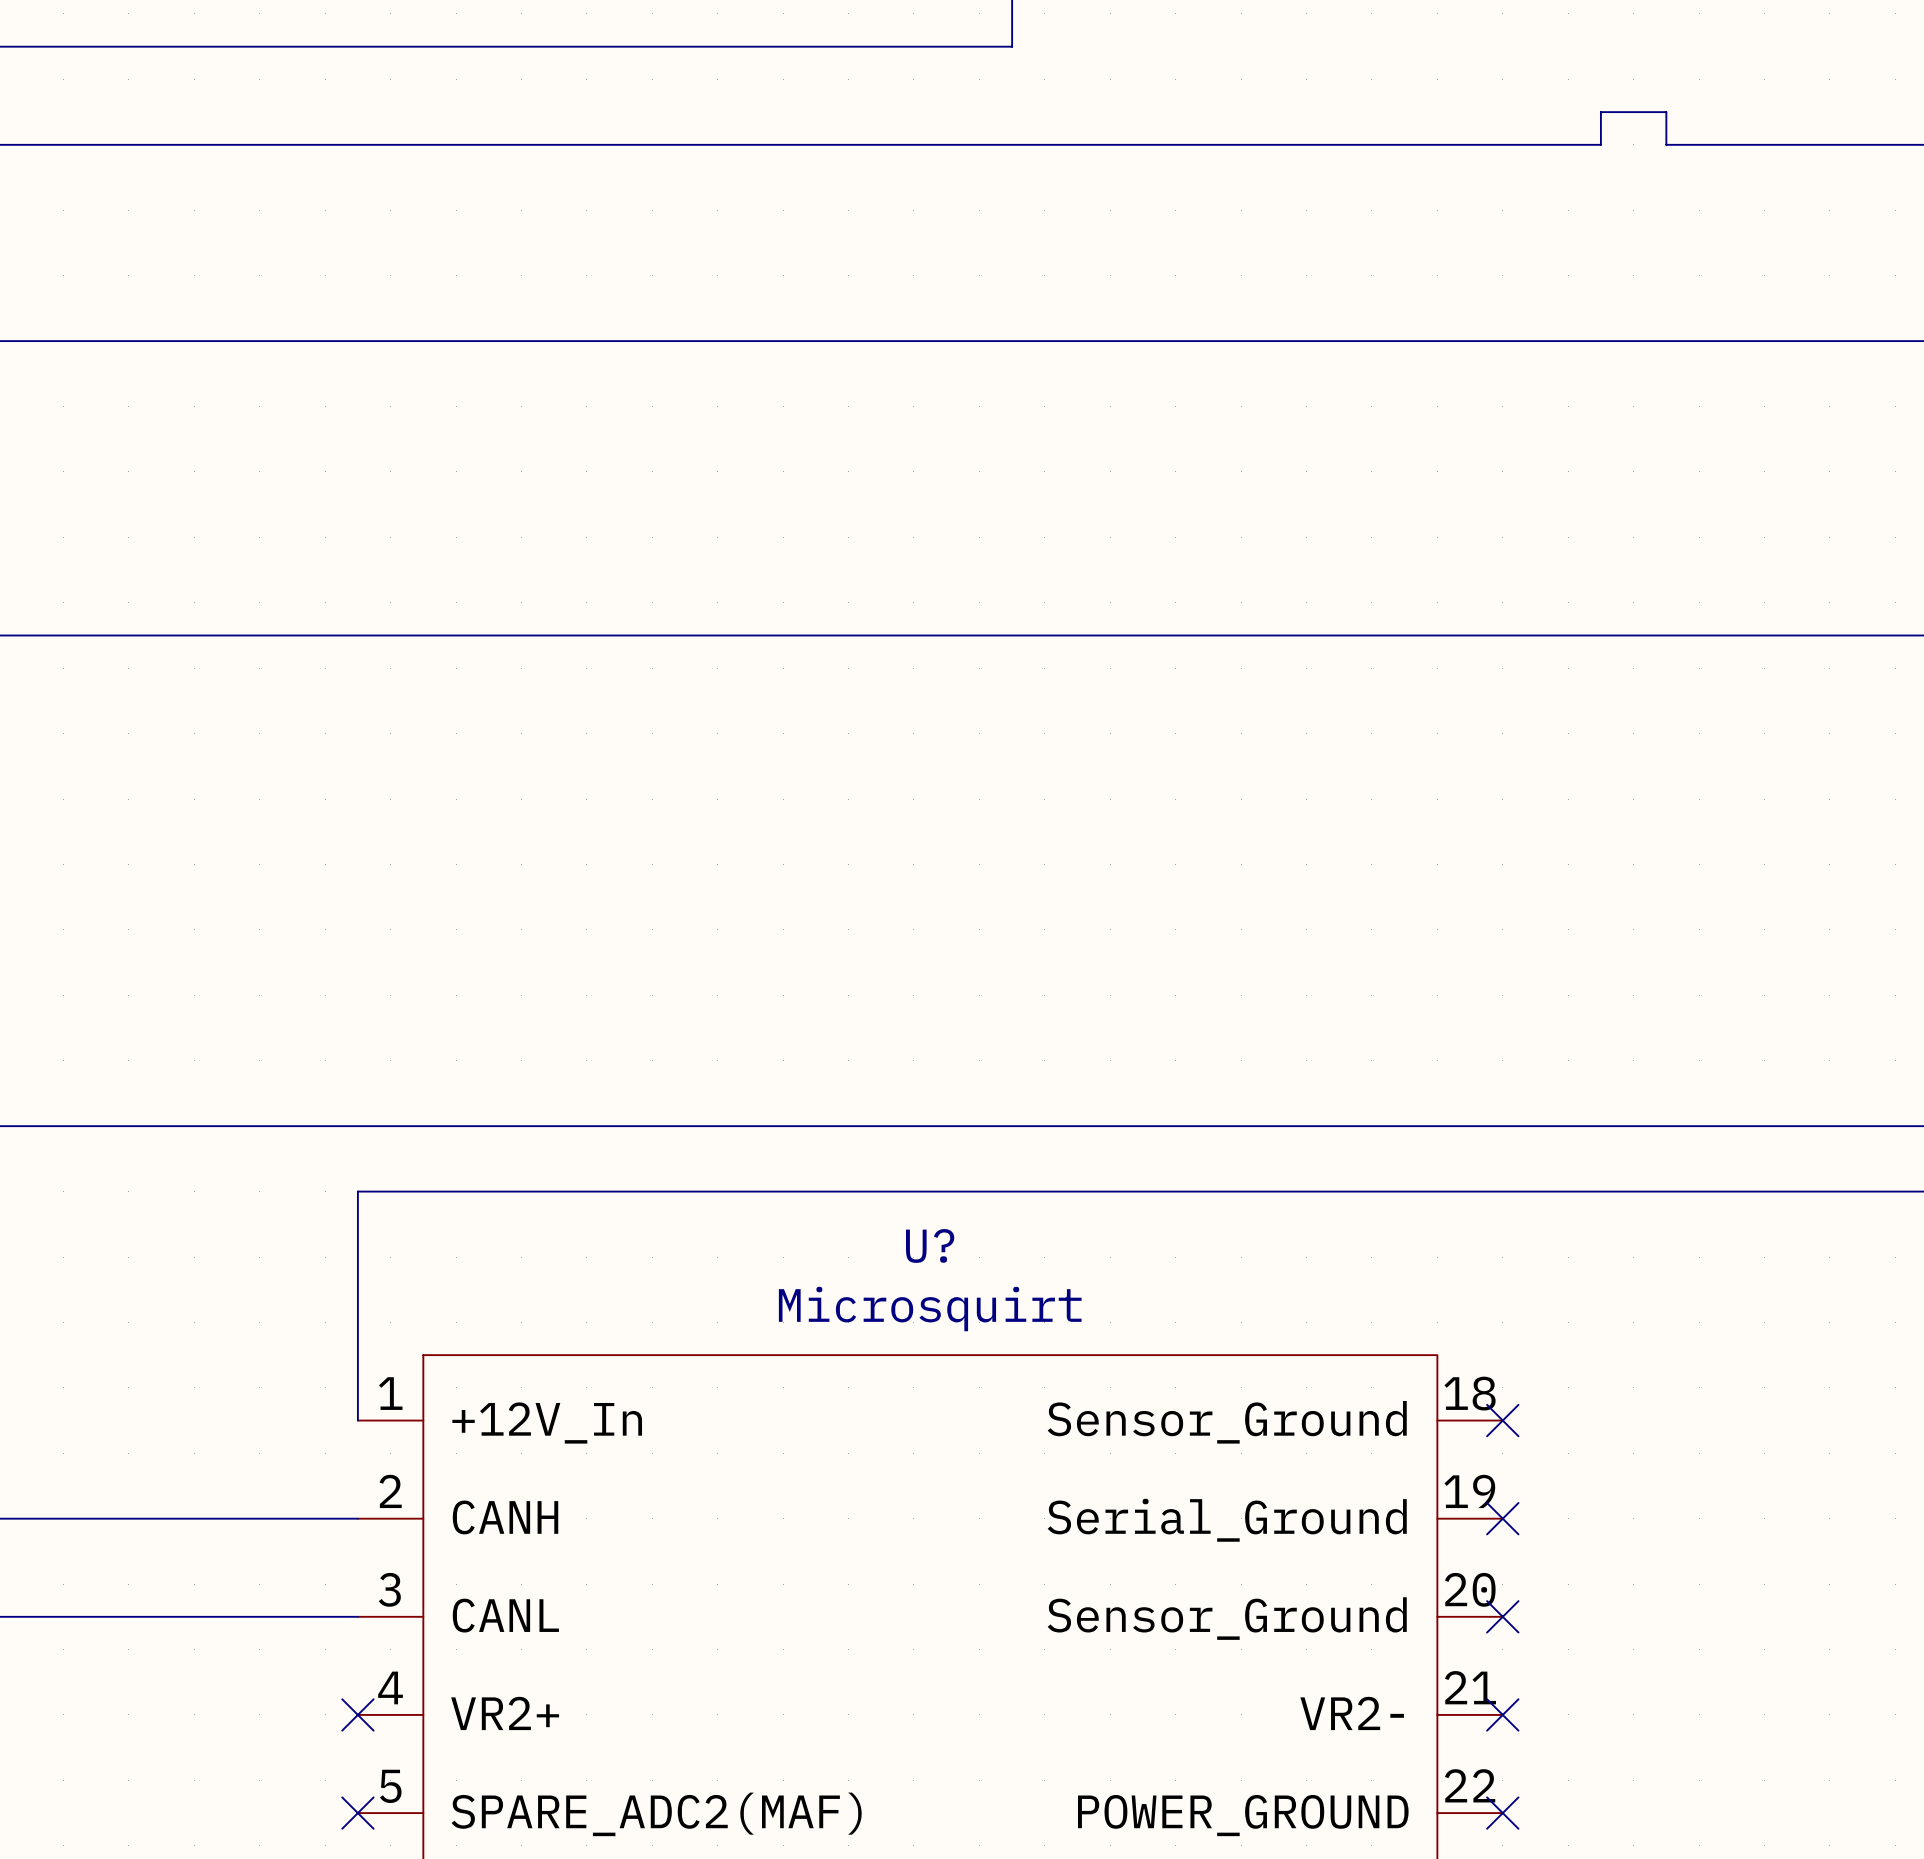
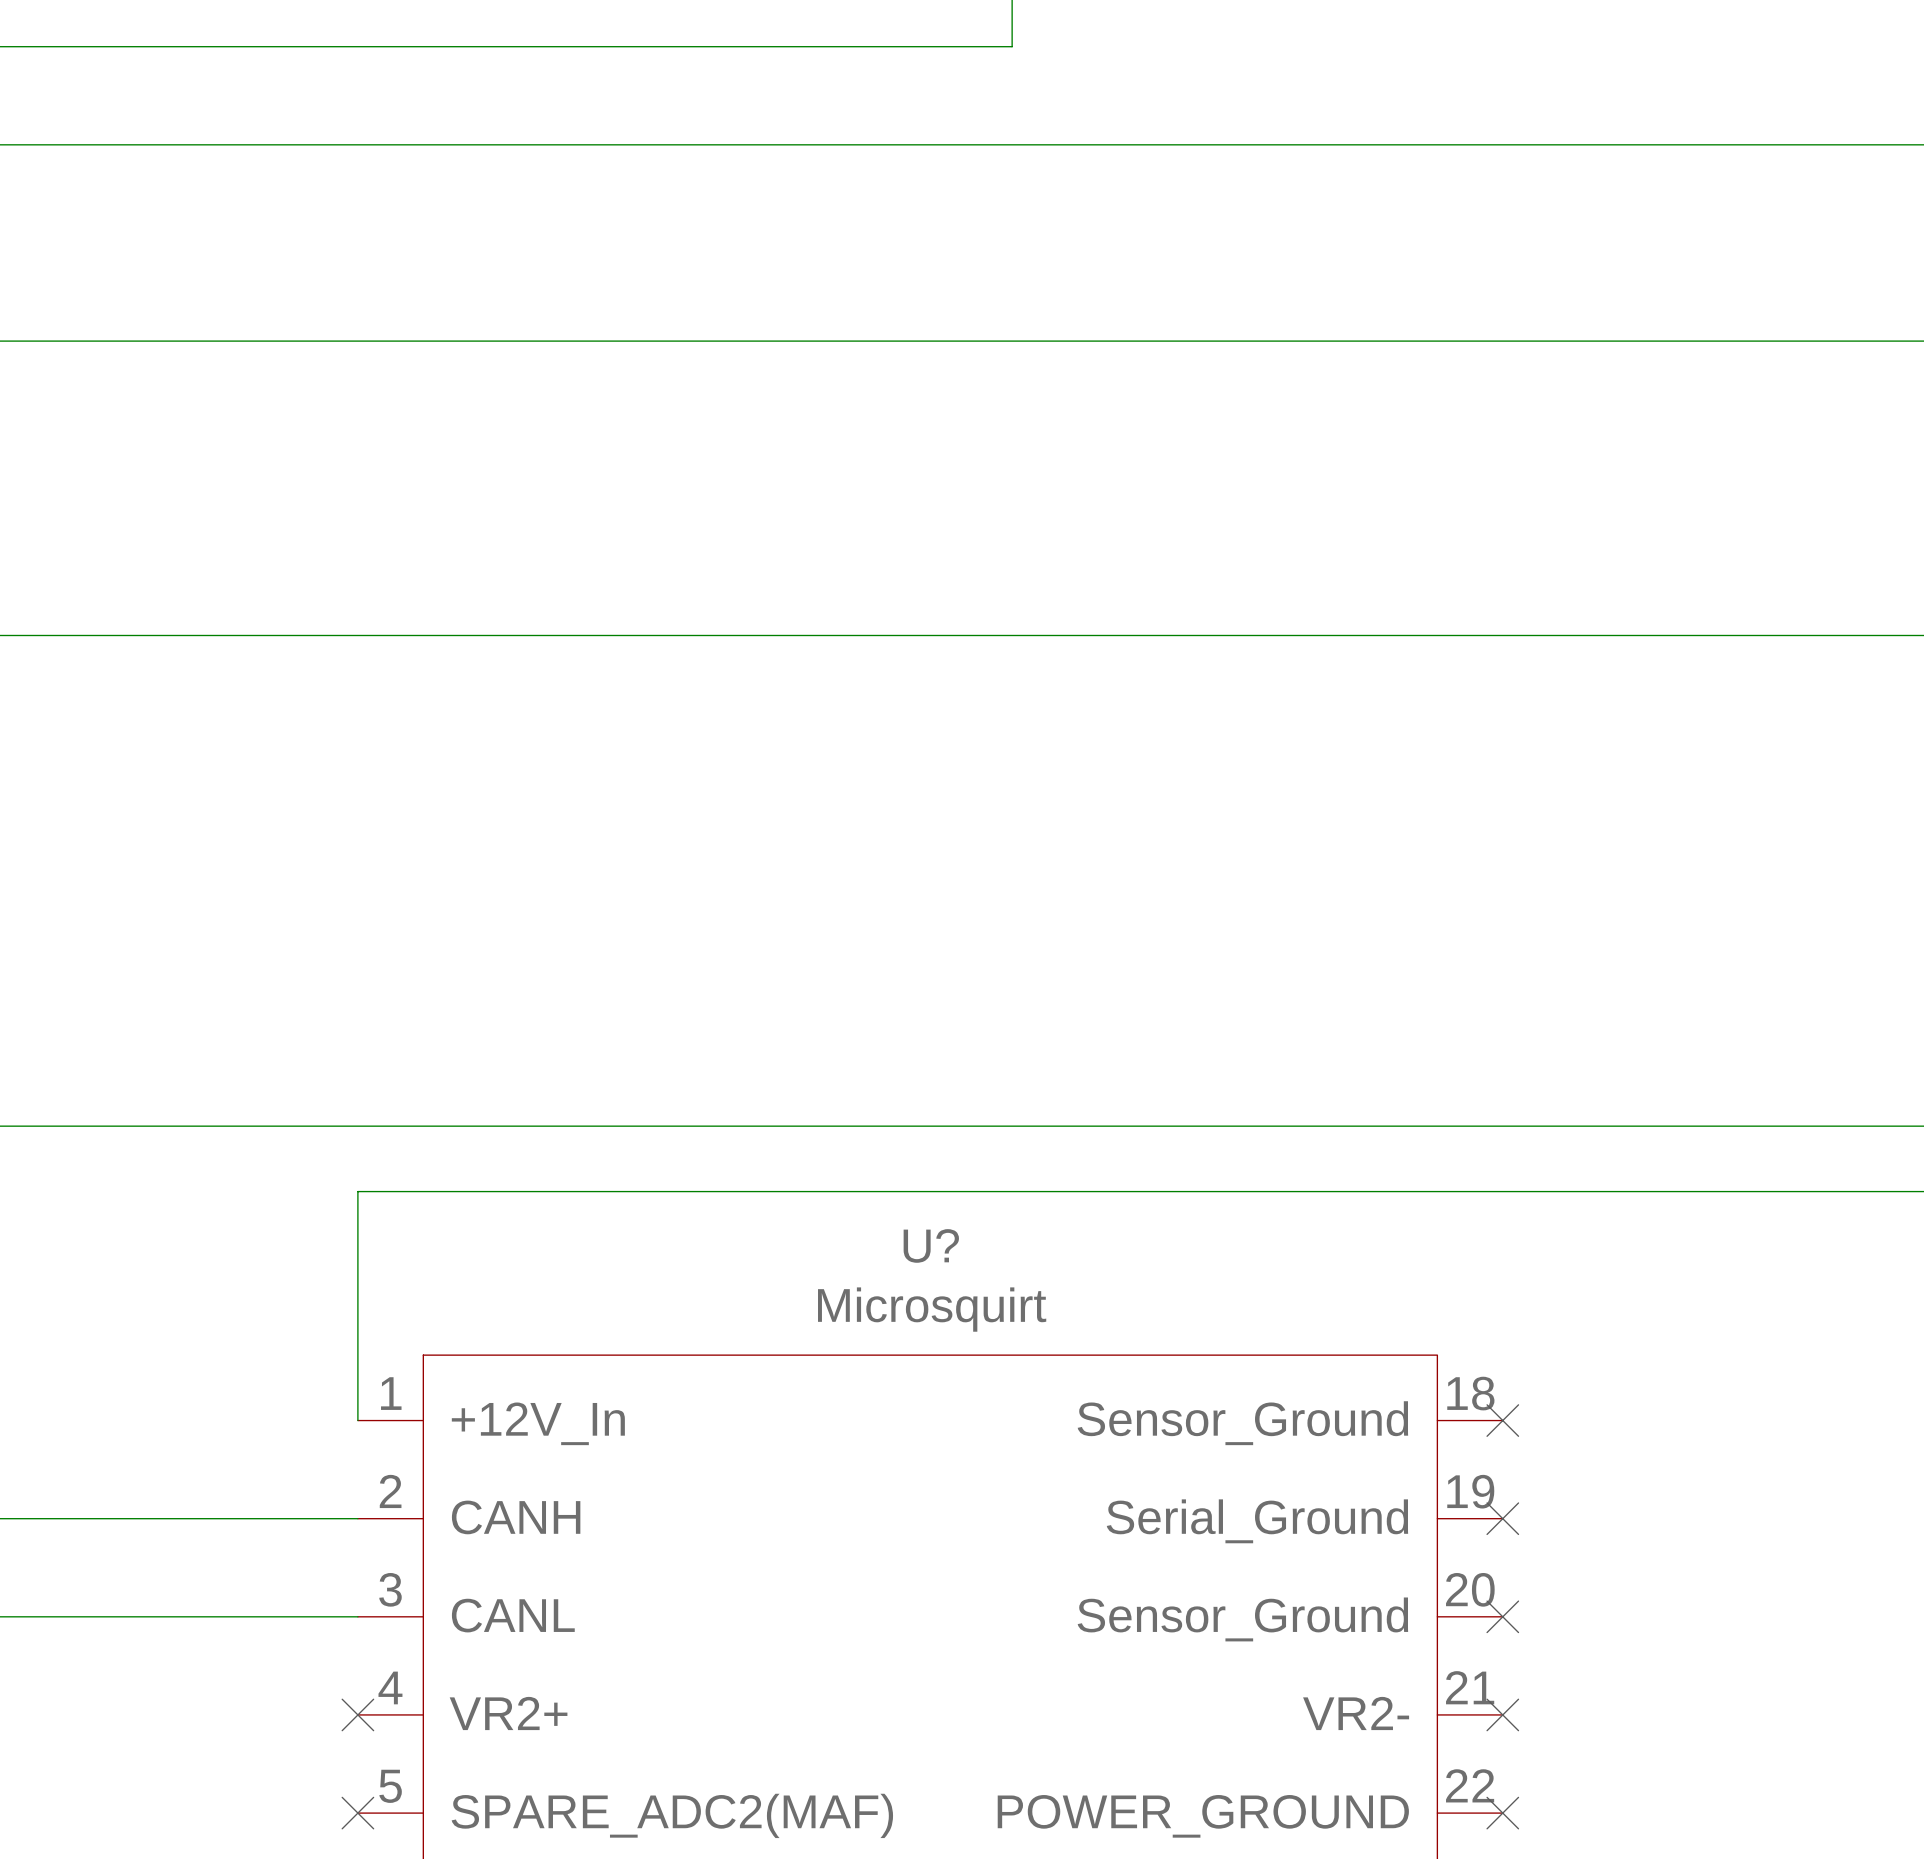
wire: (1600, 144) (1600, 112) (1666, 112) (1666, 144) -> (1600, 144) (1666, 144)

